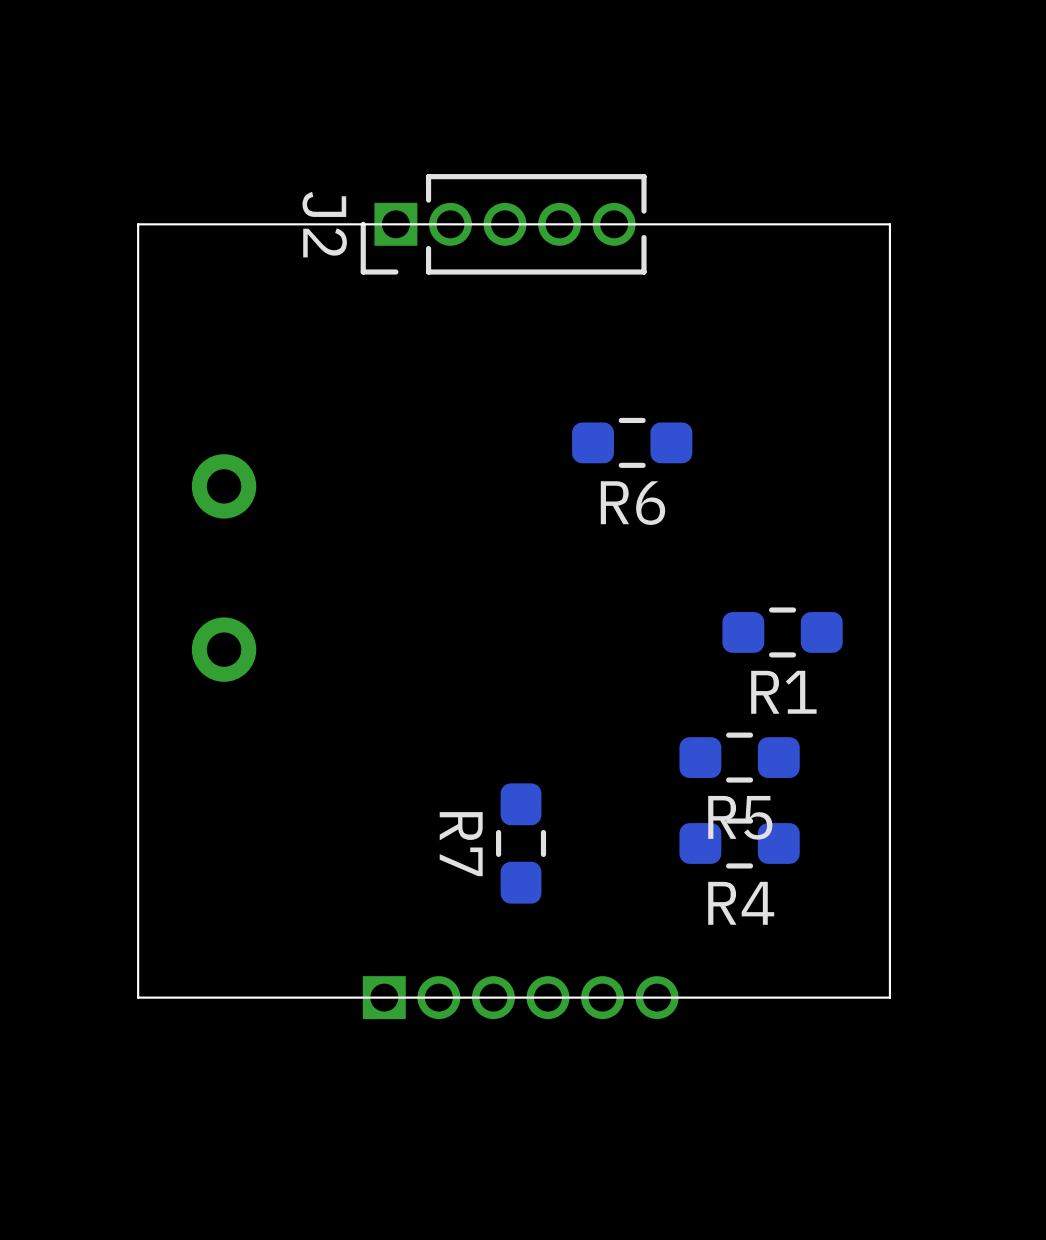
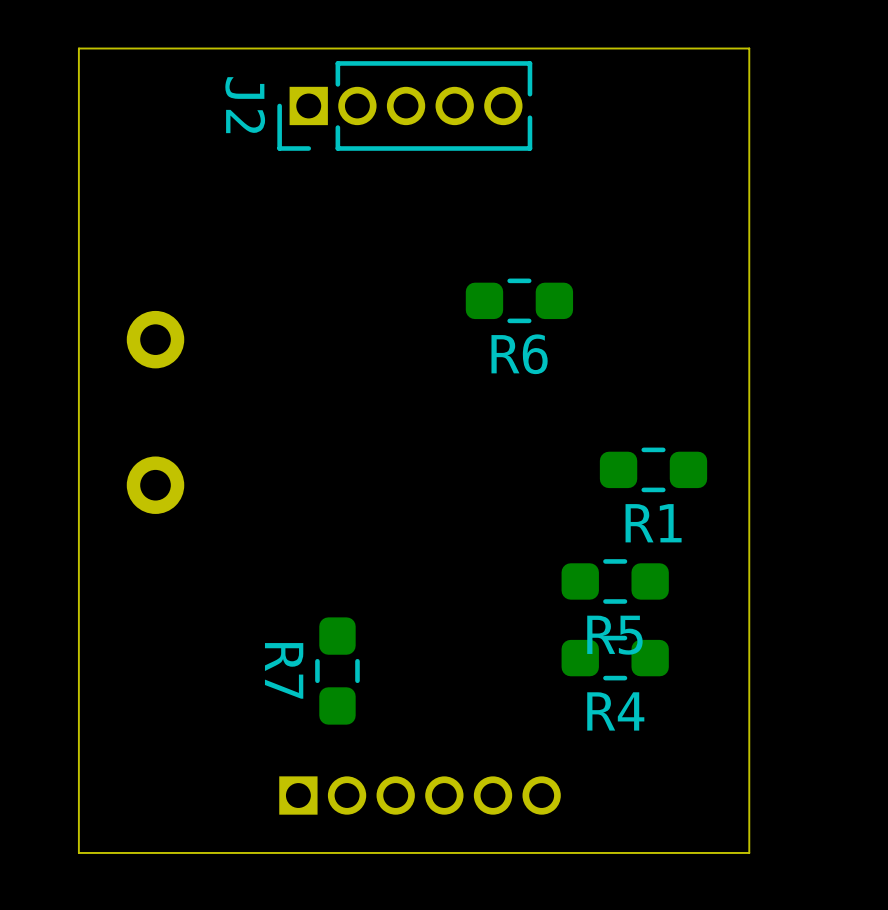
board edge: (889, 224) (138, 224) -> (749, 105) (749, 48) (78, 48) (78, 105)
R7 position: (521, 843) -> (337, 671)
board edge: (889, 997) (138, 997) -> (749, 795) (749, 852) (78, 852) (78, 795)

